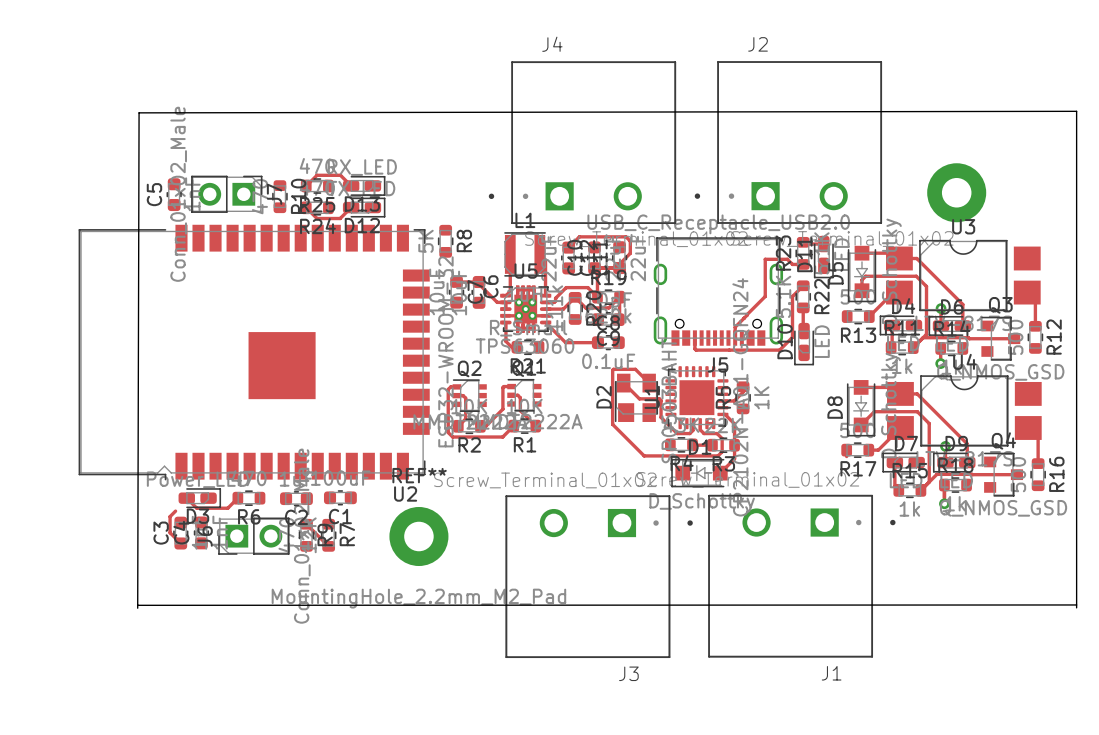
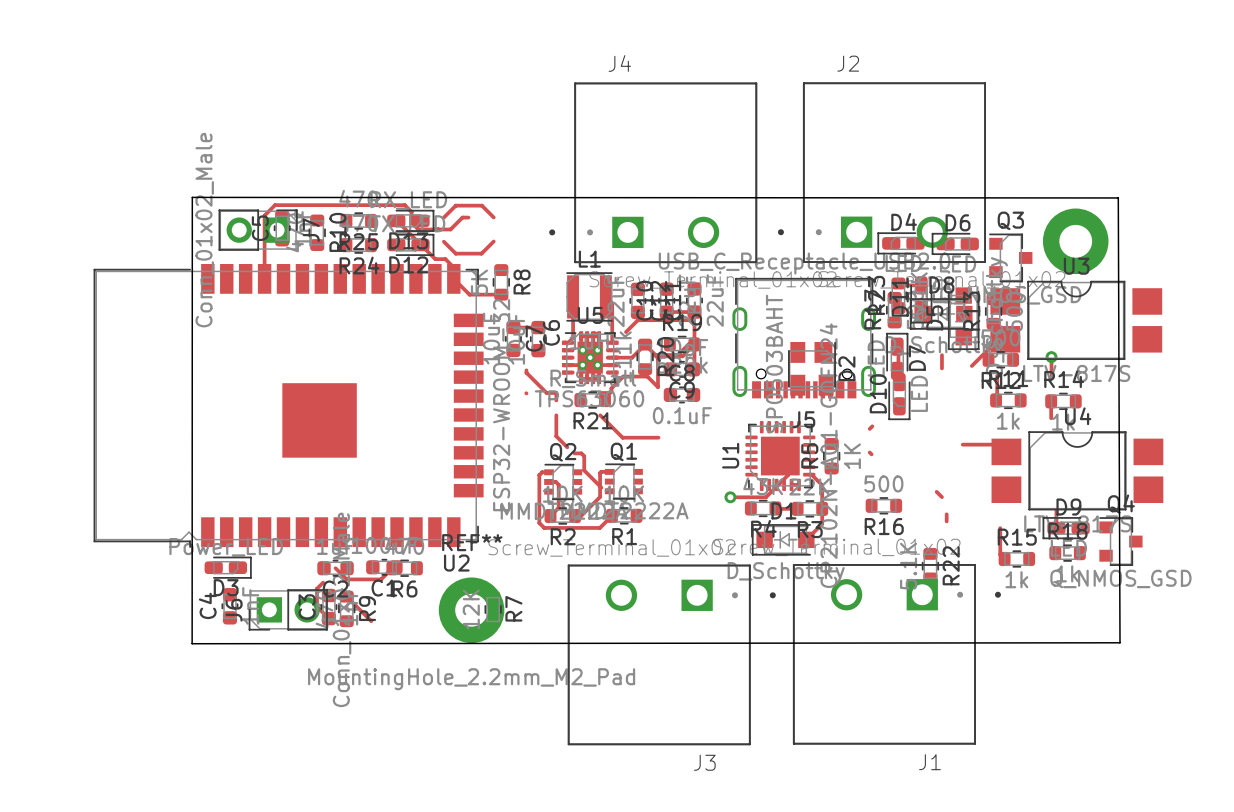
board edge: none -> (192, 197) (1118, 197) (1120, 642) (192, 643) (192, 197)
track: none -> (468, 217) (462, 217) (450, 229) (418, 229) (411, 222) (411, 212) (404, 205) (275, 205) (264, 215) (264, 278)
track: none -> (399, 218) (399, 223) (435, 259) (445, 259) (453, 267) (453, 278) (469, 294) (501, 294)
track: (351, 185) (340, 175) (316, 175) (306, 186) -> (493, 217) (481, 205) (455, 205) (443, 217)
part position: (956, 192) -> (1075, 241)
C5 position: (174, 194) -> (282, 228)
track: (351, 207) (340, 218) (316, 218) (306, 207) -> (493, 241) (481, 253) (455, 253) (443, 241)
track: (568, 247) (579, 236) (626, 236) (630, 241) (630, 253) (615, 268) (594, 268) (597, 271) (597, 297) (587, 287) (566, 287) (555, 298) (554, 302) (545, 302) -> (625, 332) (637, 320) (689, 320) (694, 324) (694, 338) (677, 355) (654, 355) (657, 358) (657, 387) (647, 376) (623, 376) (611, 388) (609, 392) (600, 392)
track: (861, 253) (894, 253) (899, 258) (916, 258) (962, 304) (962, 325) -> none
track: (803, 264) (792, 264) (787, 259) (765, 259) (765, 296) (735, 327) (735, 338) -> none
track: (479, 282) (497, 302) (505, 302) (505, 309) -> (526, 370) (526, 372) (546, 392) (556, 392) (556, 400)
track: (803, 285) (792, 296) (792, 337) (779, 350) (696, 350) (694, 338) -> none
track: (861, 290) (861, 280) (865, 276) (916, 276) (926, 286) (926, 334) (913, 347) -> none
track: (1027, 292) (1035, 300) (1035, 326) -> none
R22 position: (803, 296) -> (930, 566)
track: none -> (941, 355) (941, 368)
R13 rotation: 0° (858, 316) -> 90° clockwise (993, 311)
R13 position: (858, 316) -> (993, 311)
track: (505, 322) (505, 341) (515, 351) -> (556, 415) (556, 436) (567, 447)
track: (545, 322) (565, 342) (597, 342) -> (600, 415) (622, 437) (658, 437)
D4 position: (900, 325) -> (900, 243)
D6 position: (949, 325) -> (955, 243)
track: (923, 337) (1014, 338) -> none
R12 rotation: 0° (1035, 337) -> 90° clockwise (1000, 359)
R12 position: (1035, 337) -> (1000, 359)
Q3 position: (1000, 338) -> (1010, 257)
via: (940, 363) -> none
track: none -> (872, 426) (869, 428)
track: (623, 383) (639, 398) (659, 398) (661, 400) (661, 417) (677, 433) (689, 433) (692, 430) (693, 423) -> none
track: (649, 383) (635, 369) (612, 370) (612, 424) (644, 455) (718, 455) (722, 451) (722, 438) (717, 433) (704, 433) (700, 429) (700, 423) -> none
track: (456, 386) (450, 386) (448, 389) (448, 432) (452, 437) (502, 437) (513, 426) -> (549, 472) (542, 472) (539, 475) (539, 522) (544, 527) (599, 527) (612, 515)
track: (511, 386) (502, 387) (502, 409) (485, 426) (480, 426) -> (609, 471) (600, 473) (600, 497) (581, 516) (575, 516)
track: (743, 386) (743, 392) (734, 401) (722, 401) -> none
track: none -> (869, 452) (871, 454)
track: (456, 395) (463, 395) (465, 398) (465, 418) (458, 426) -> (549, 481) (555, 481) (558, 484) (558, 507) (550, 516)
Q2 position: (469, 395) -> (563, 481)
Q1 position: (524, 395) -> (623, 481)
track: (900, 395) (900, 393) (917, 393) (967, 443) (967, 462) -> none
D2 rotation: 0° (636, 397) -> 180° (811, 368)
D2 position: (636, 397) -> (811, 368)
track: none -> (788, 468) (788, 475) (765, 497) (730, 497)
D8 rotation: 0° (861, 408) -> 90° clockwise (941, 313)
D8 position: (861, 408) -> (941, 313)
track: (861, 424) (874, 411) (917, 411) (929, 423) (929, 482) -> none
R2 position: (469, 426) -> (562, 516)
R1 position: (524, 426) -> (624, 515)
track: (900, 427) (878, 450) (868, 450) -> none
track: (1028, 427) (1038, 437) (1038, 463) -> none
track: none -> (936, 491) (941, 497)
via: none -> (730, 497)
via: (945, 446) -> none
R17 rotation: 0° (857, 450) -> 90° clockwise (894, 310)
R17 position: (857, 450) -> (894, 310)
D7 rotation: 0° (903, 462) -> 90° clockwise (897, 356)
D7 position: (903, 462) -> (897, 356)
track: (1016, 474) (936, 474) (920, 490) -> none
R16 rotation: 0° (1038, 474) -> 90° clockwise (883, 505)
R16 position: (1038, 474) -> (883, 505)
track: (186, 498) (196, 508) (227, 508) (237, 498) -> (335, 568) (346, 579) (381, 579) (392, 568)
R6 position: (248, 498) -> (404, 568)
via: (944, 503) -> none
track: (175, 511) (170, 516) (170, 532) (180, 543) -> (323, 582) (317, 588) (317, 606) (328, 618)
C3 position: (180, 533) -> (328, 607)
R7 position: (328, 535) -> (493, 609)
board edge: (1076, 604) (137, 605) -> none
board edge: (1076, 607) (1076, 111) (139, 112) (137, 608) -> none

